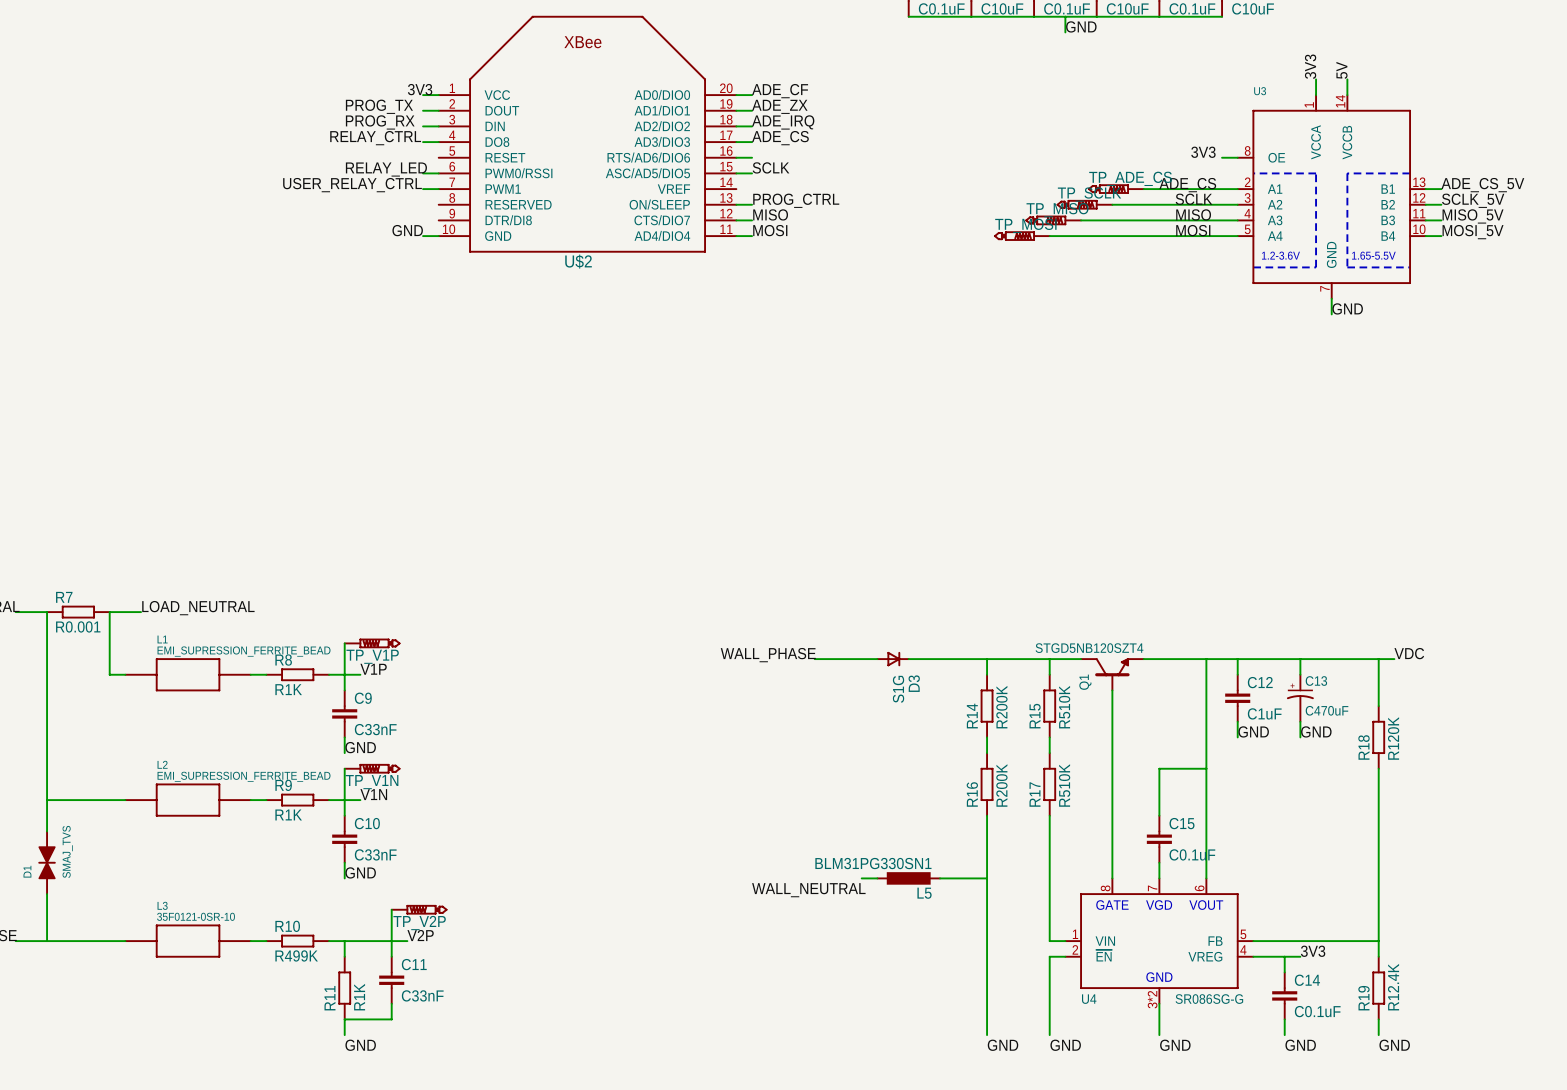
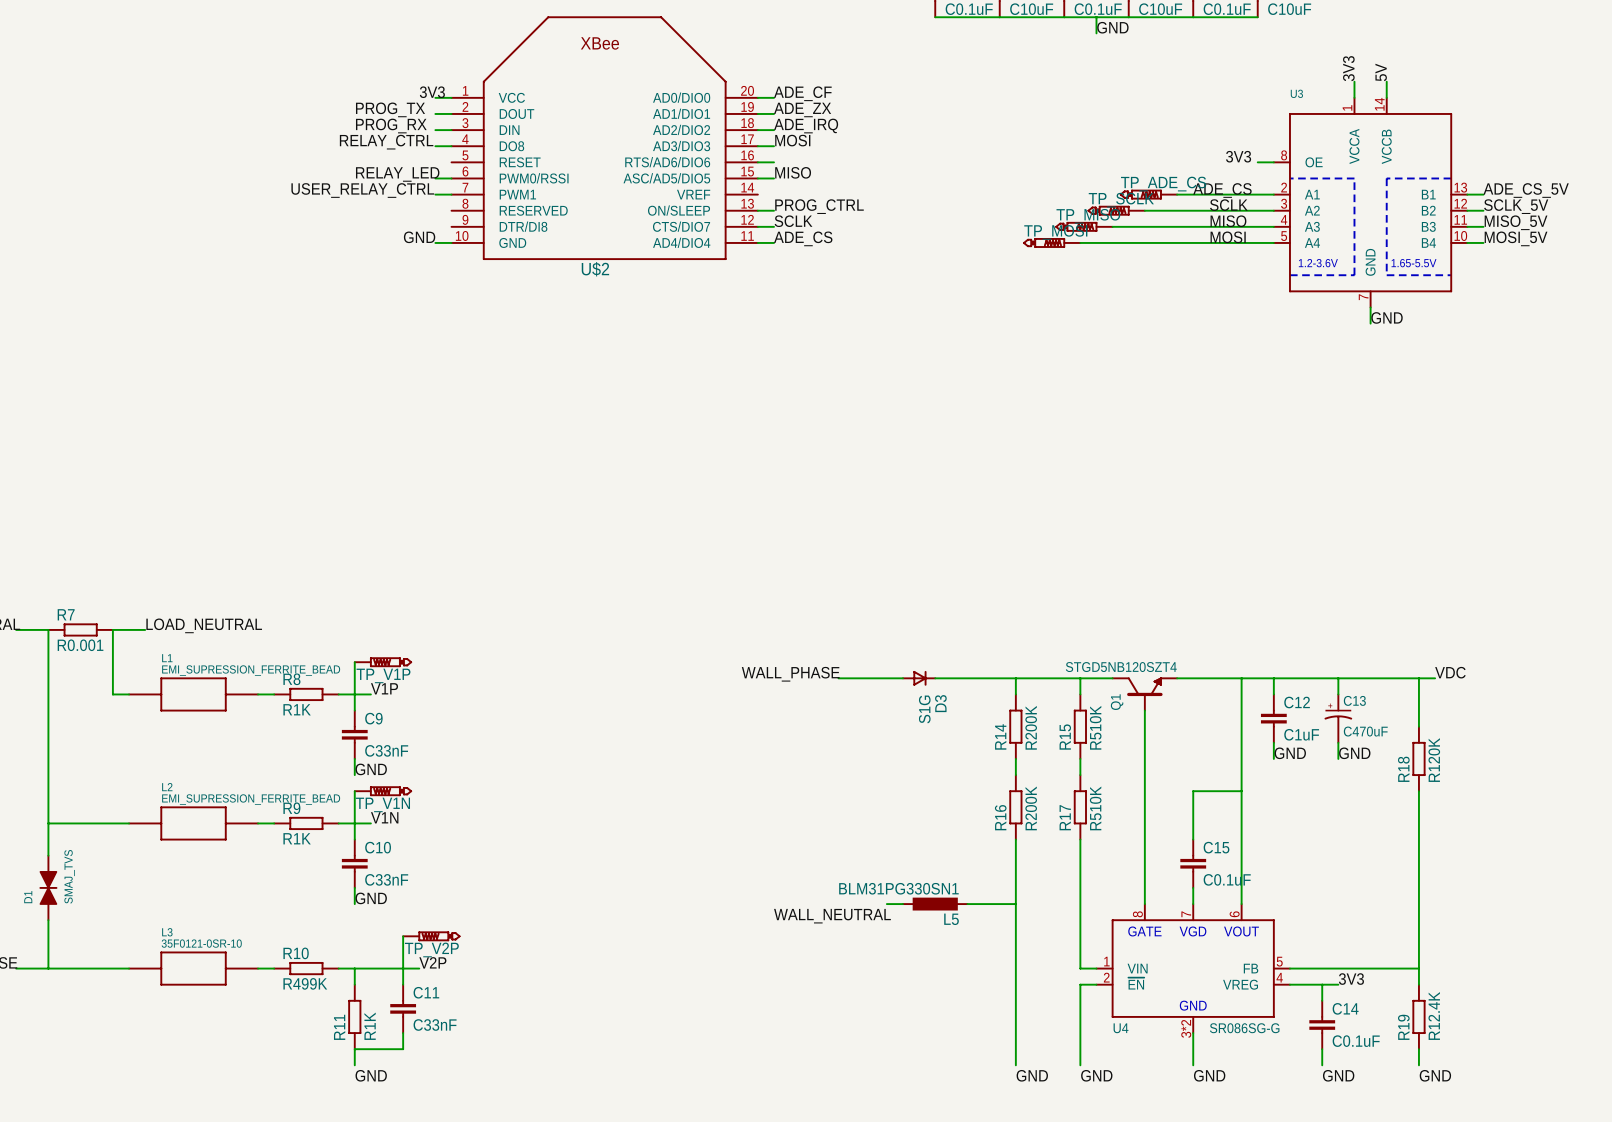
label: ADE_CS (780, 138) -> MOSI (792, 140)
label: SCLK (771, 167) -> MISO (793, 172)
label: MISO (770, 214) -> SCLK (793, 221)
label: MOSI (770, 230) -> ADE_CS (803, 238)

